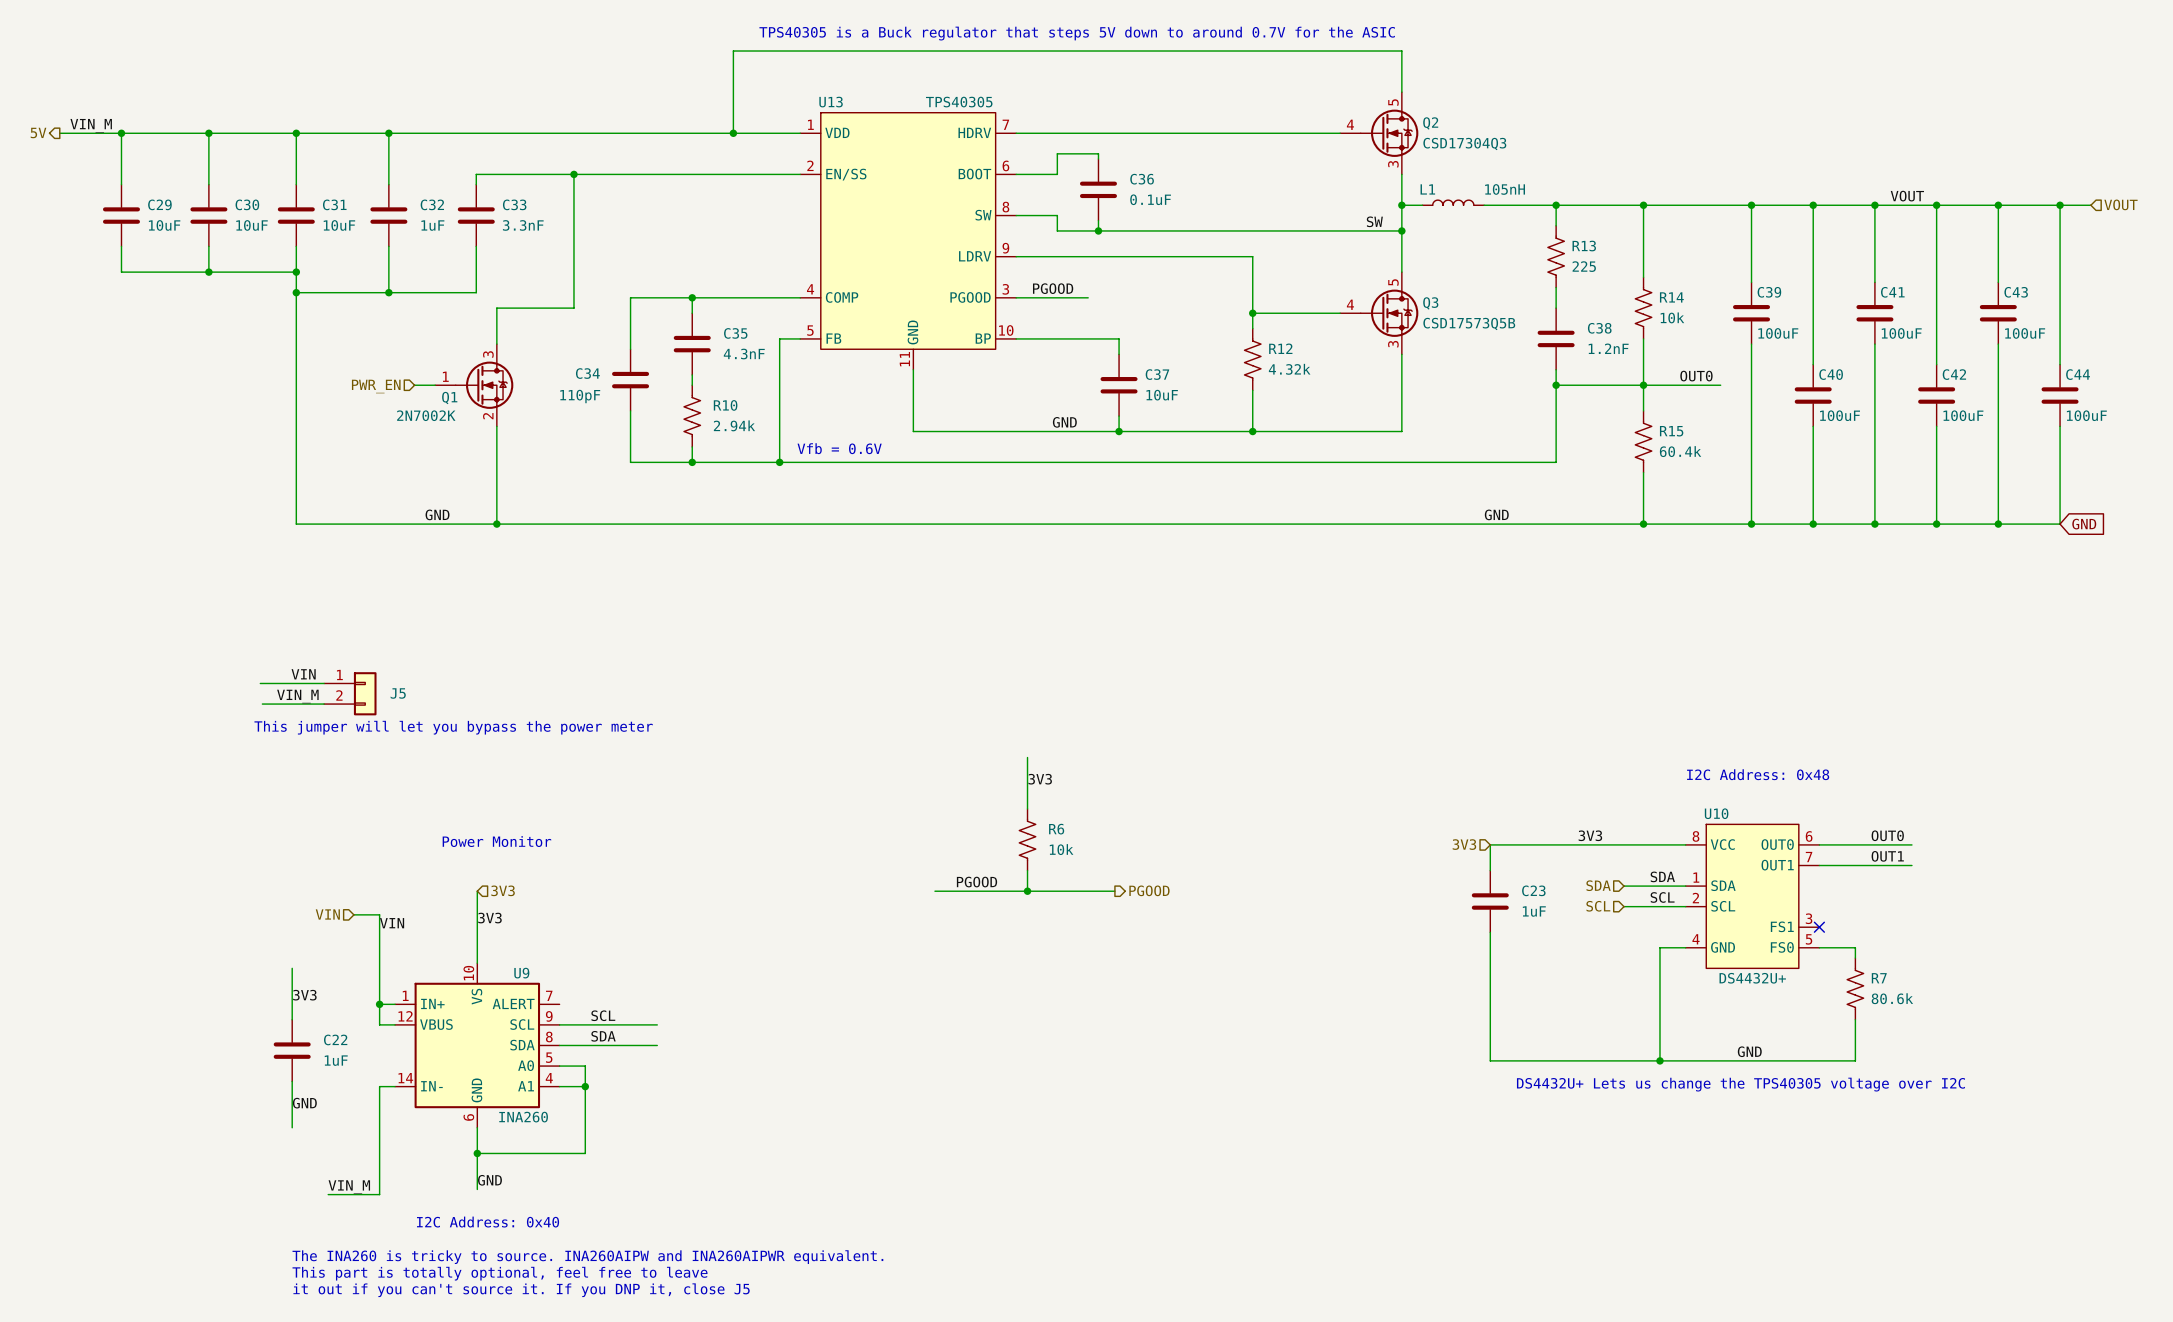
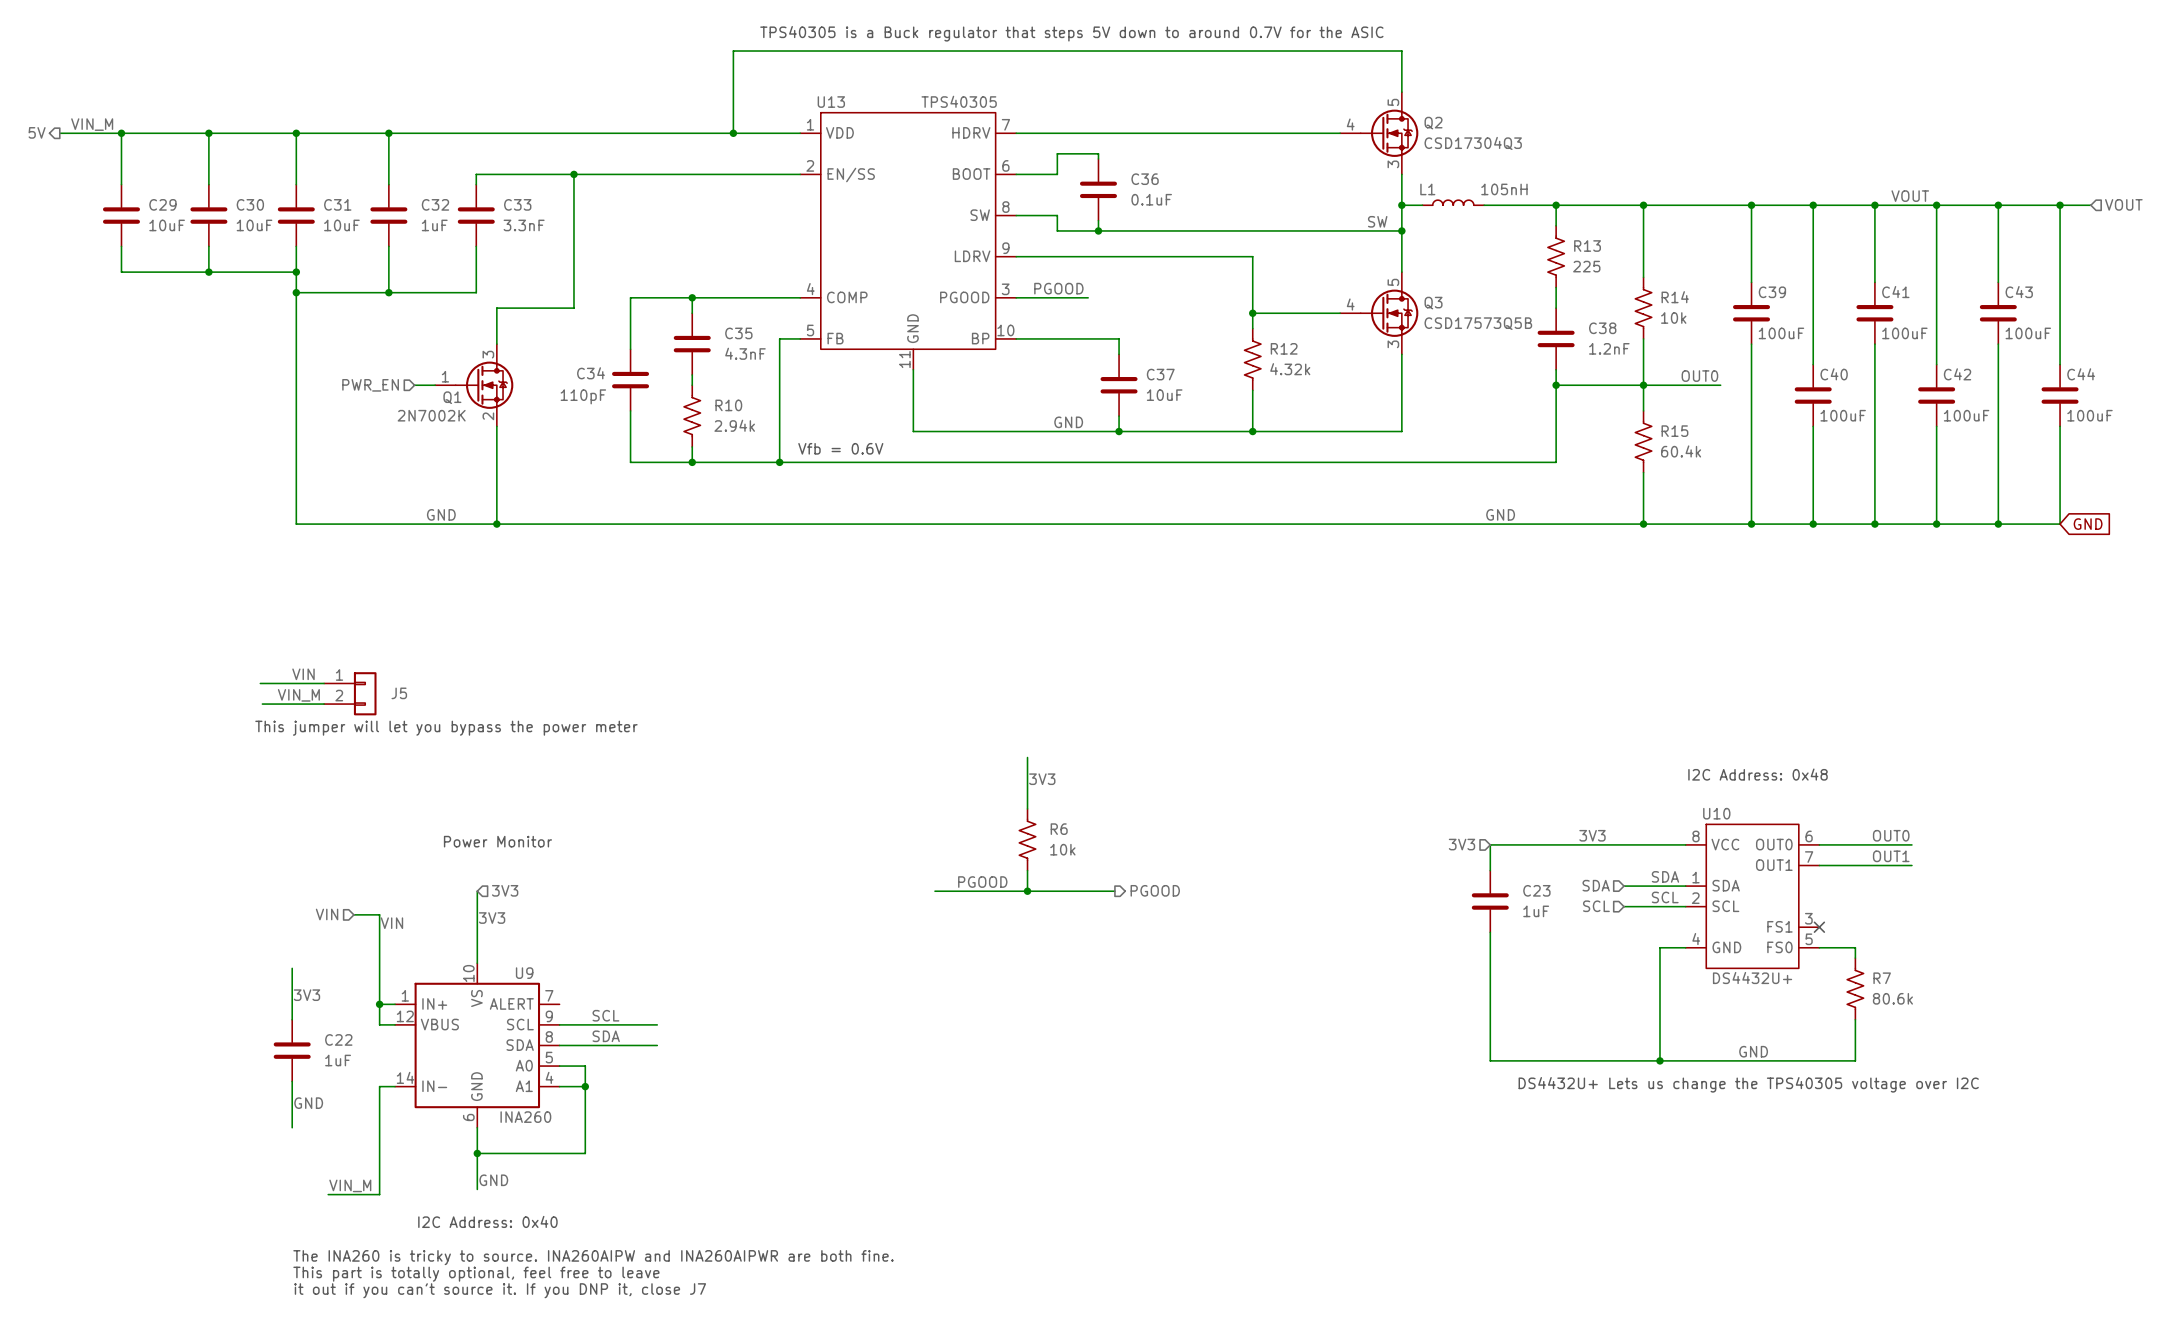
text: The INA260 is tricky to source. INA260AIPW and INA260AIPWR equivalent. (587, 1257) -> The INA260 is tricky to source. INA260AIPW and INA260AIPWR are both fine. (593, 1257)
text: it out if you can't source it. If you DNP it, close J5 (521, 1290) -> it out if you can't source it. If you DNP it, close J7 (500, 1290)

